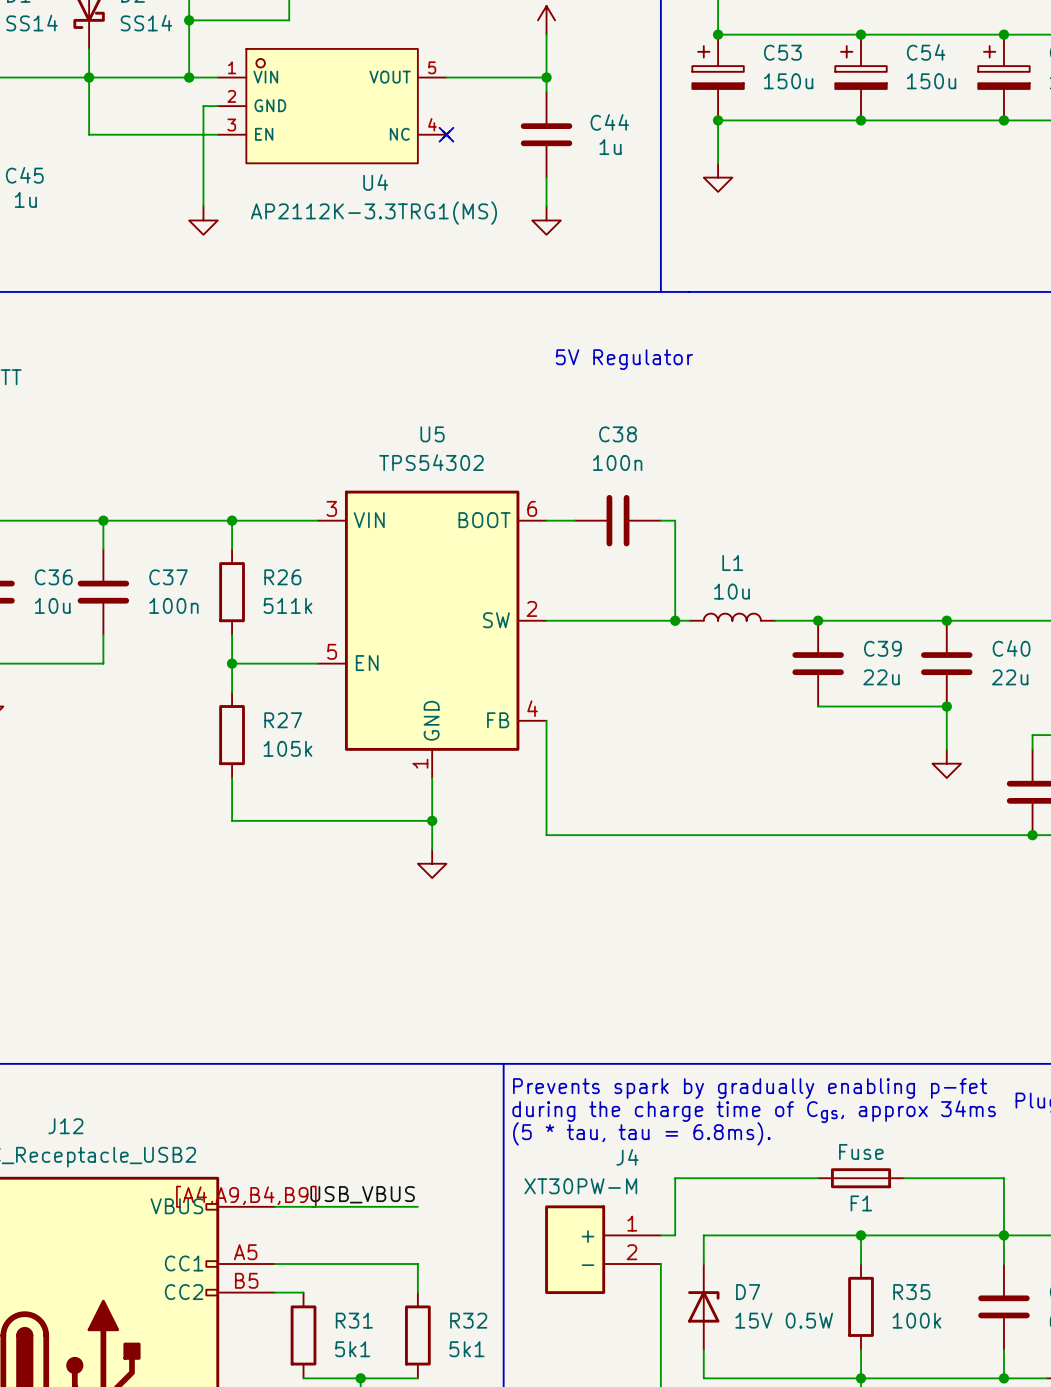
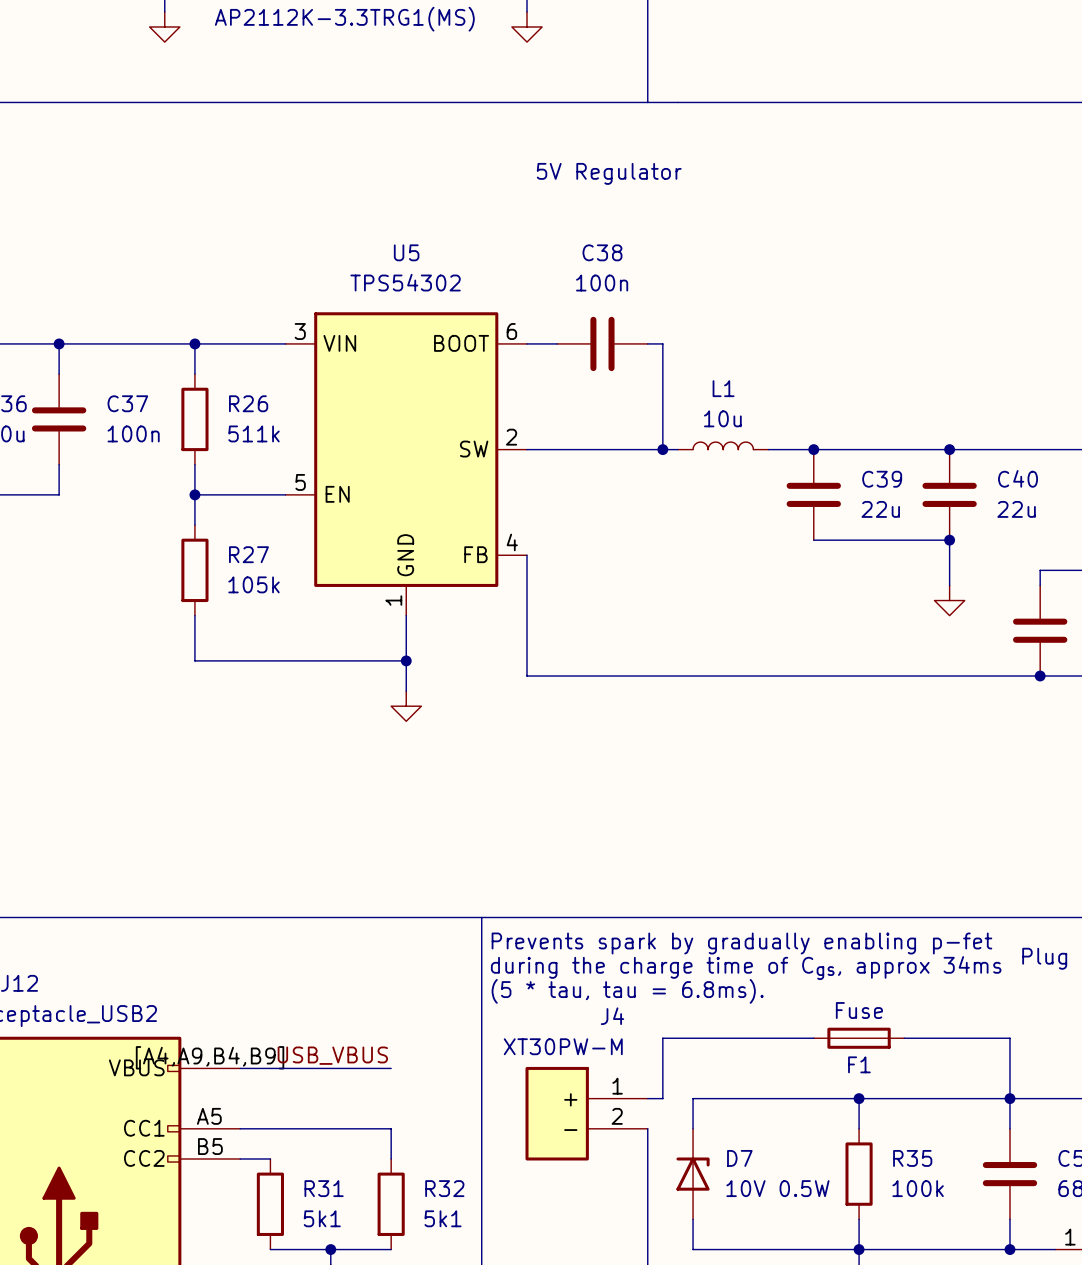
D7 value: 15V 0.5W (784, 1320) -> 10V 0.5W (777, 1188)

